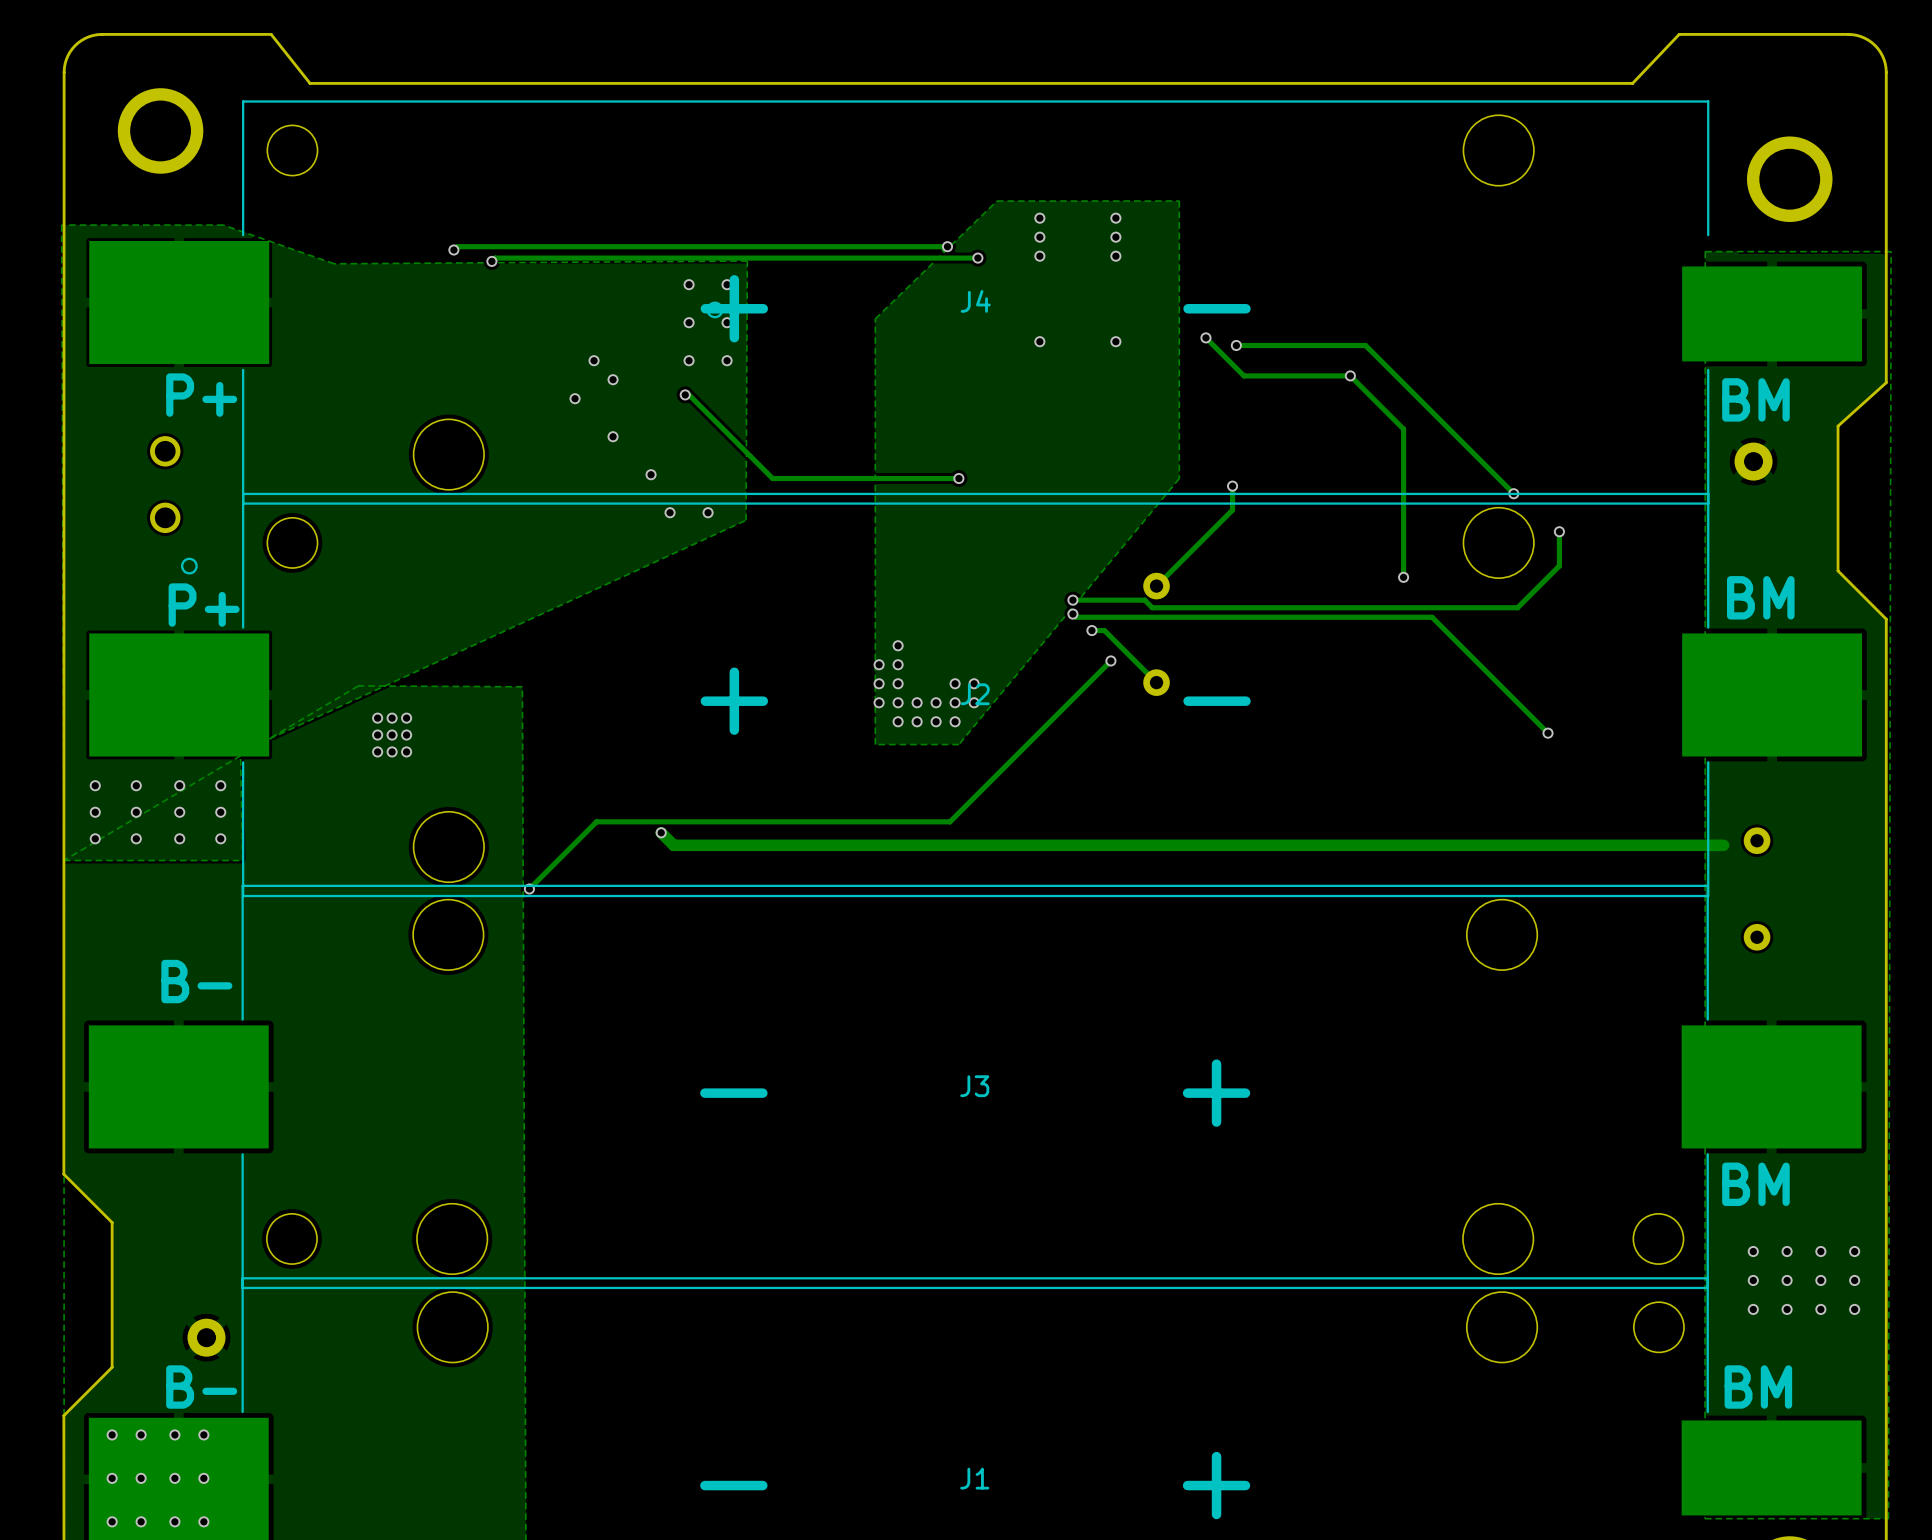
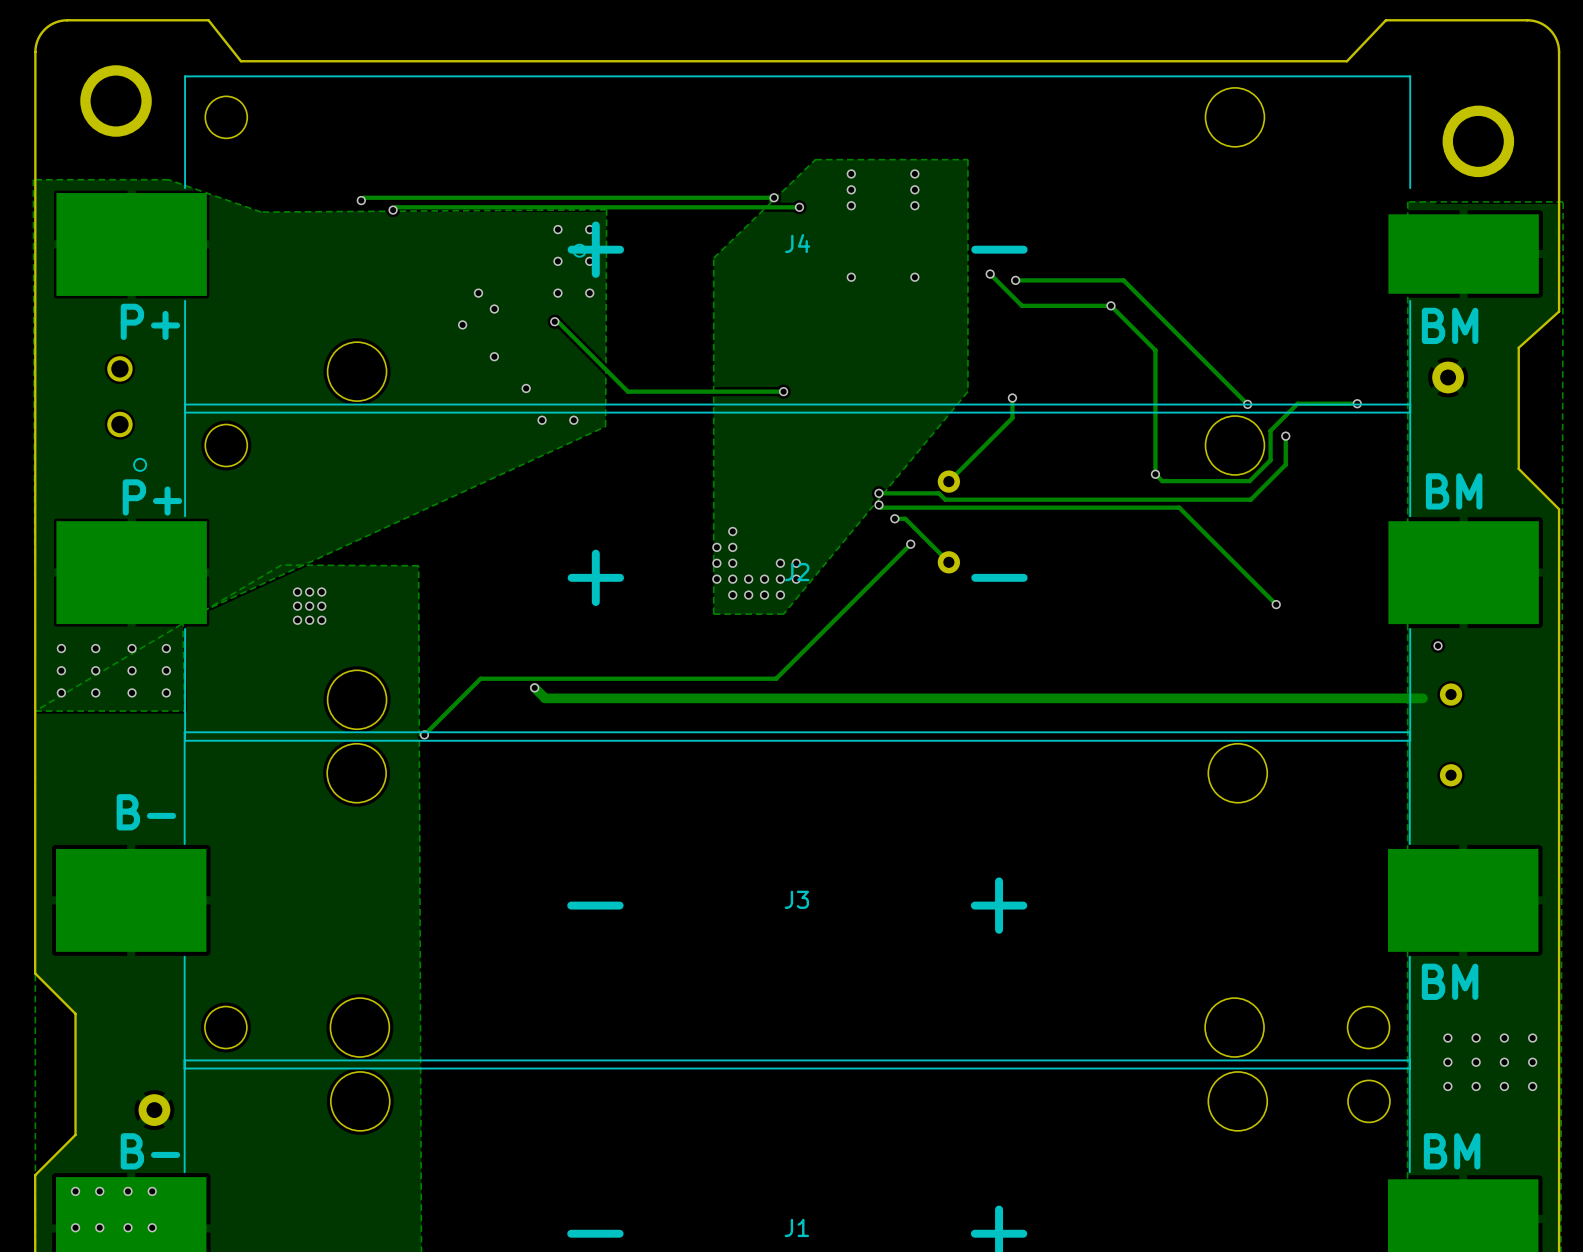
track: none -> (1357, 403) (1297, 403) (1270, 430) (1270, 460) (1249, 481) (1162, 481) (1155, 474)
via: none -> (1357, 403)
via: none -> (1438, 645)

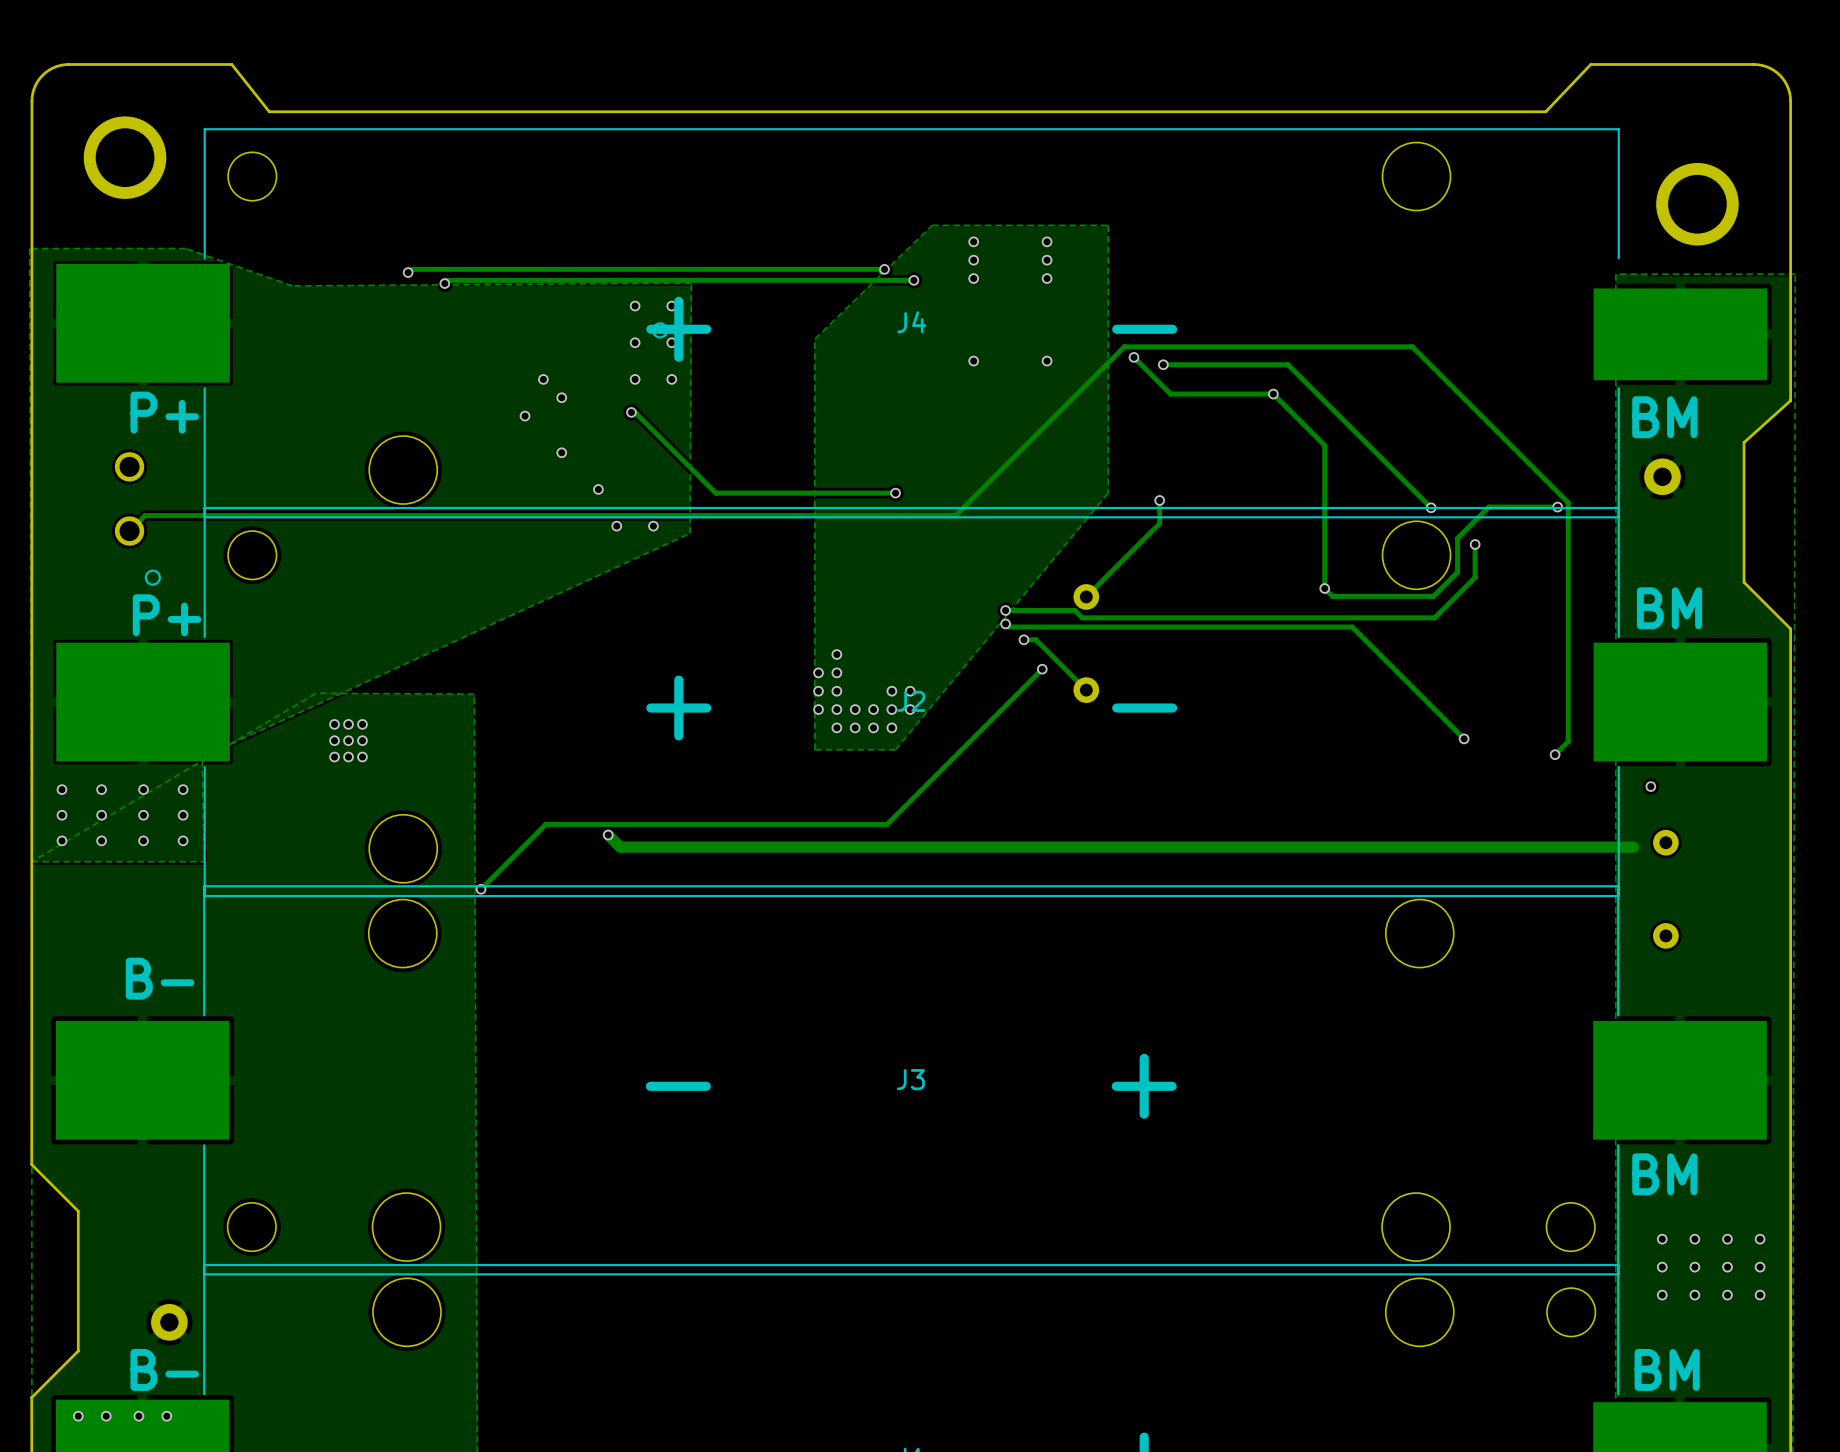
track: none -> (129, 531) (145, 515) (955, 515) (1124, 346) (1412, 346) (1568, 502) (1568, 741) (1555, 754)
via: none -> (1555, 754)

